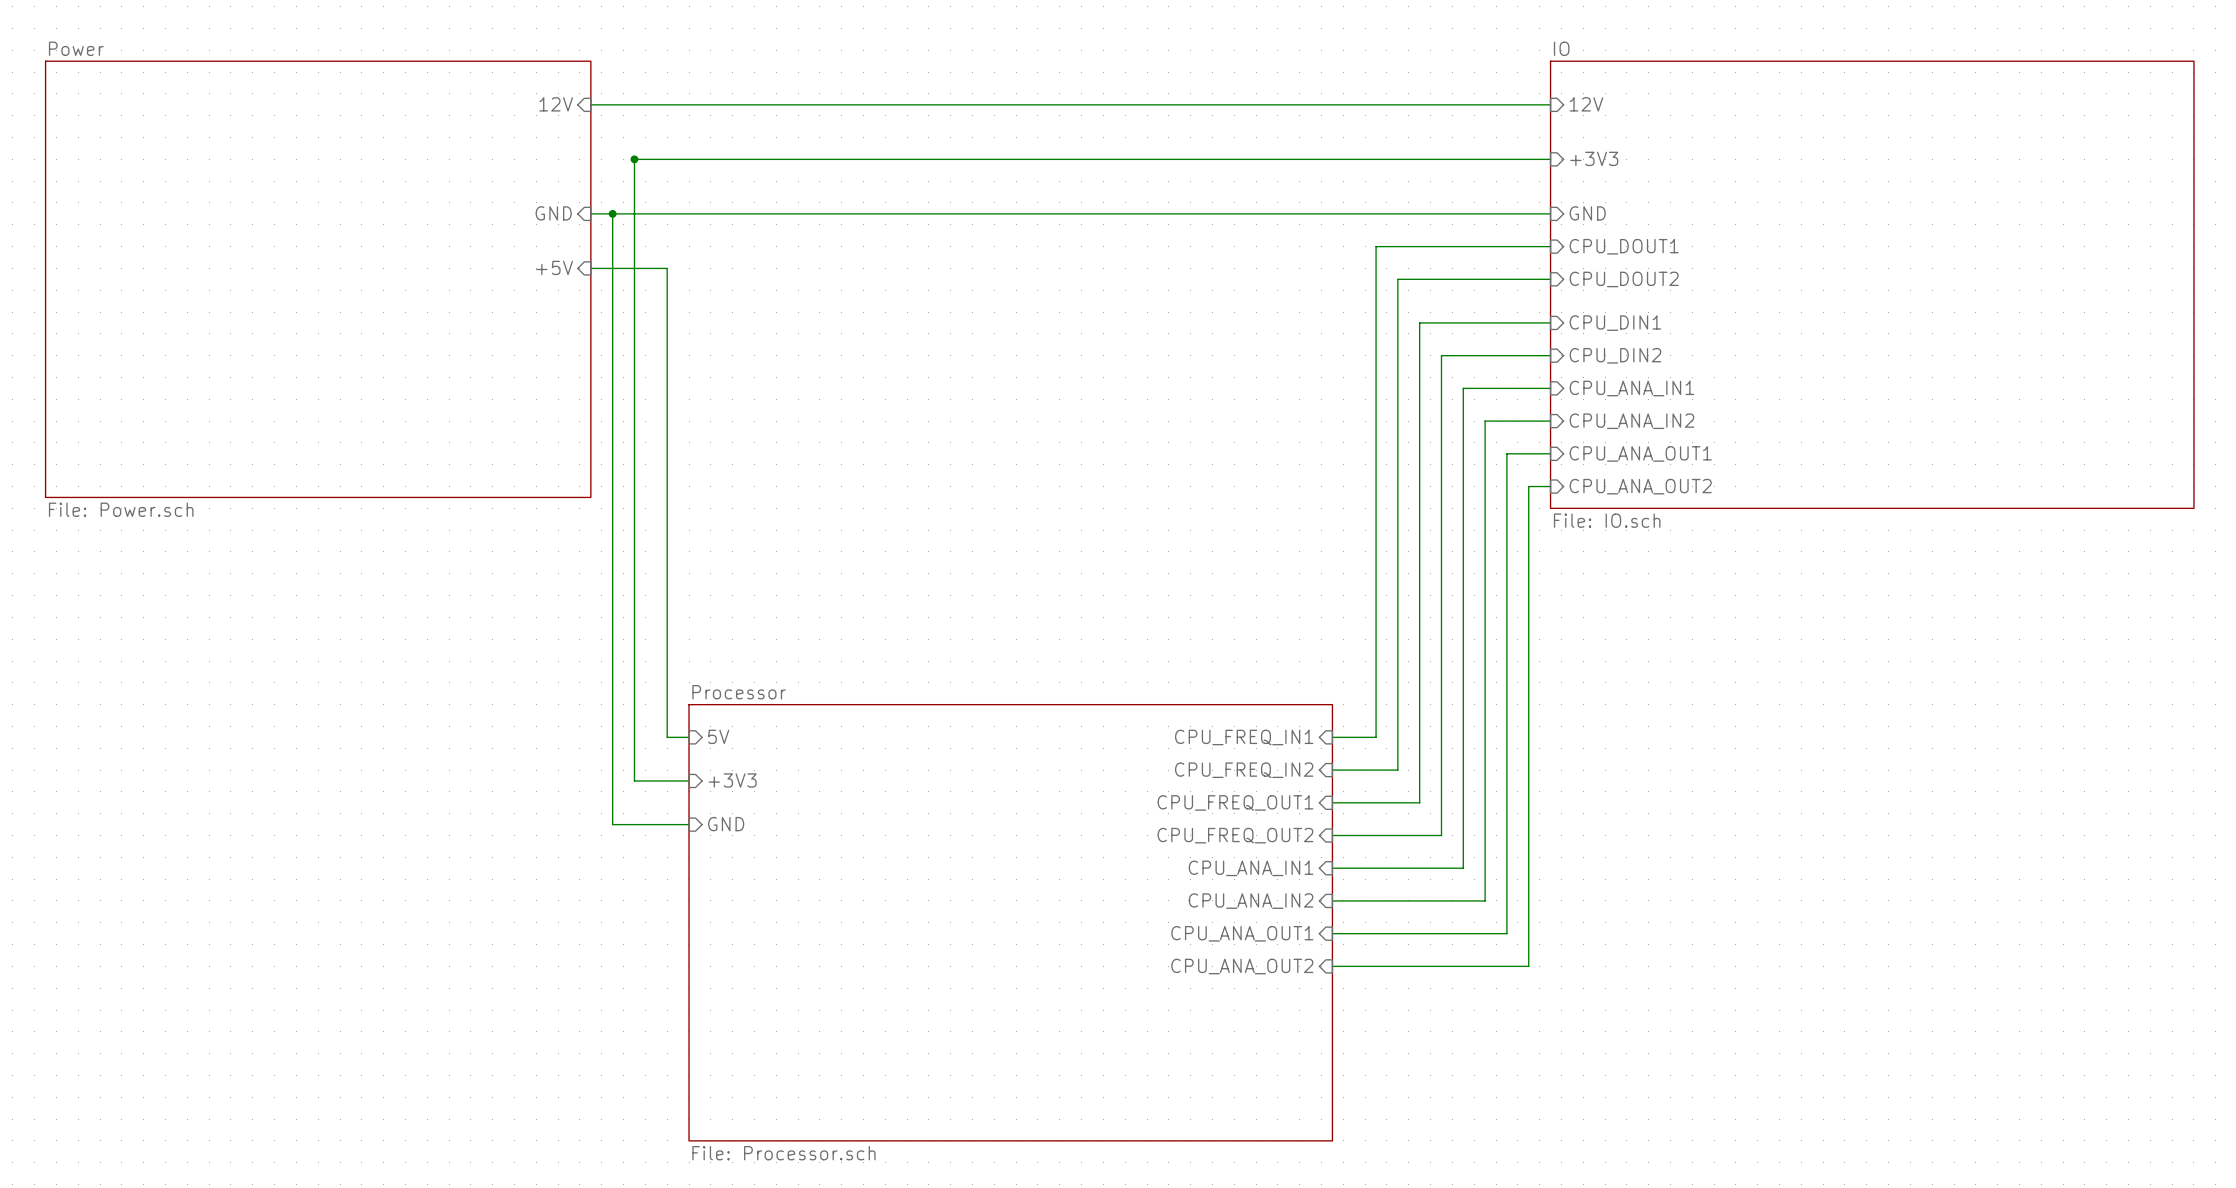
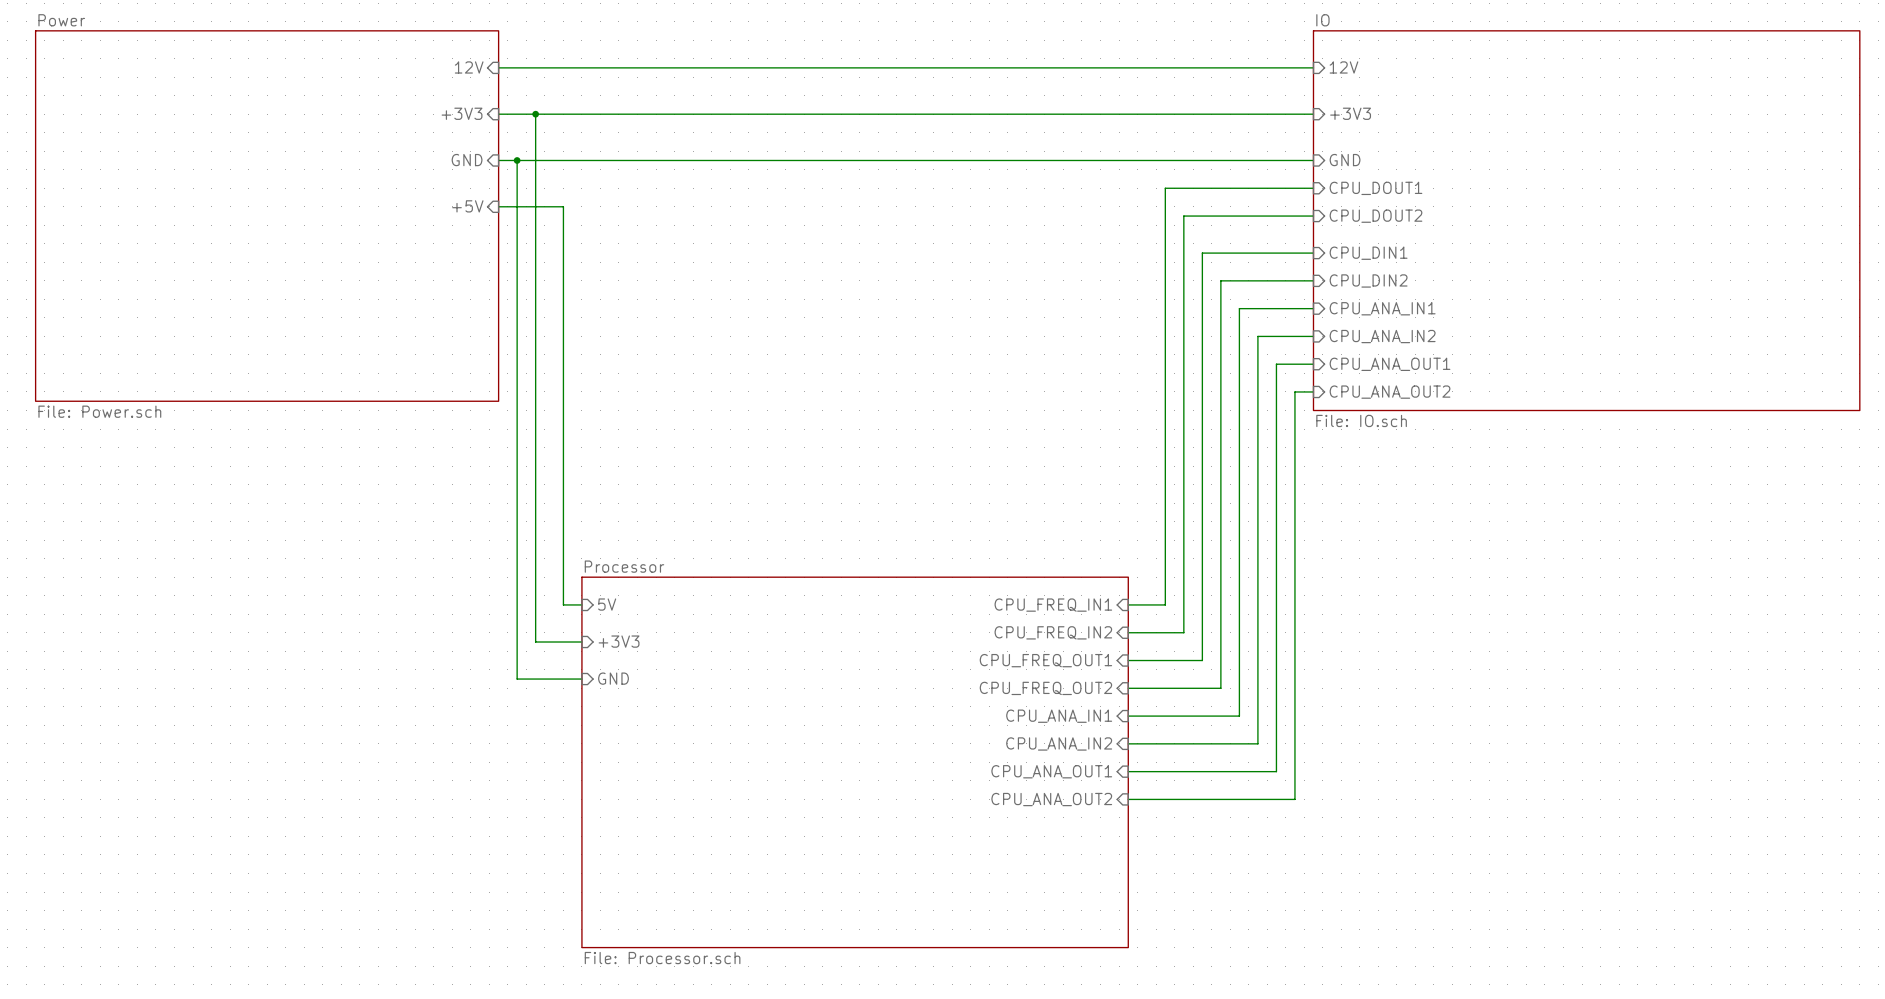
sheet pin: none -> +3V3 (462, 113)
wire: none -> (498, 114) (535, 114)

